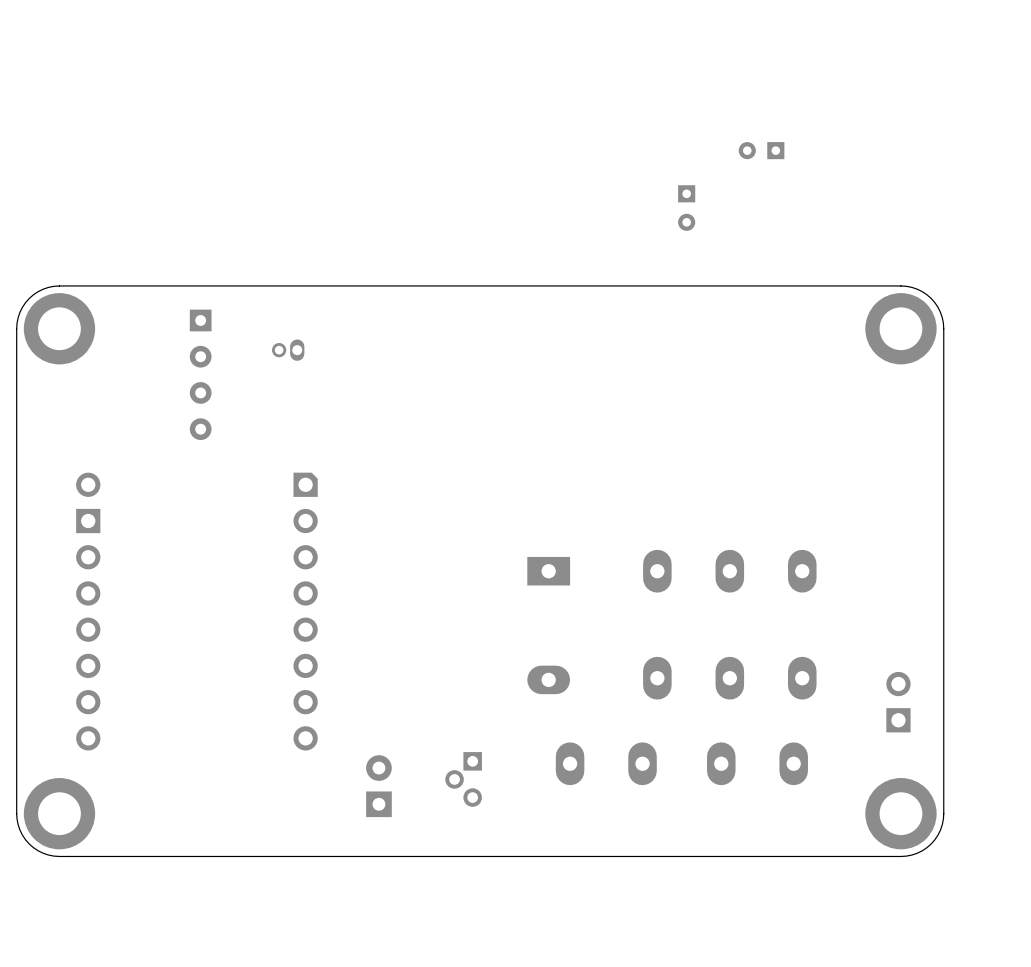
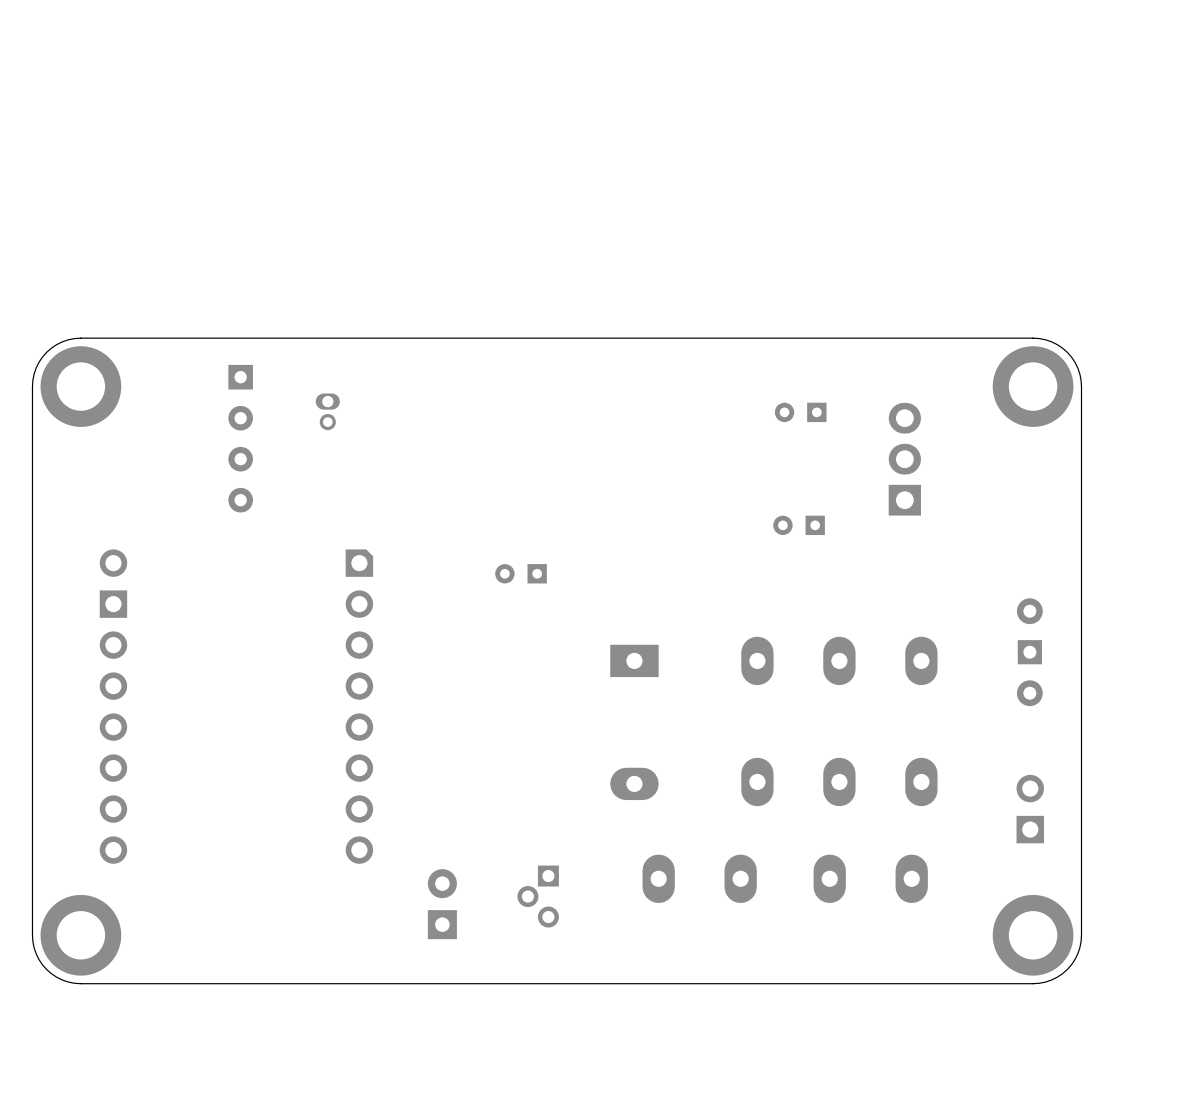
part: (761, 150) -> none
part: (686, 208) -> none
part rotation: 0° (288, 350) -> 90° counterclockwise (327, 411)
part: none -> (800, 412)
part: none -> (904, 459)
part: none -> (799, 525)
part: none -> (521, 573)
part: none -> (1029, 652)

